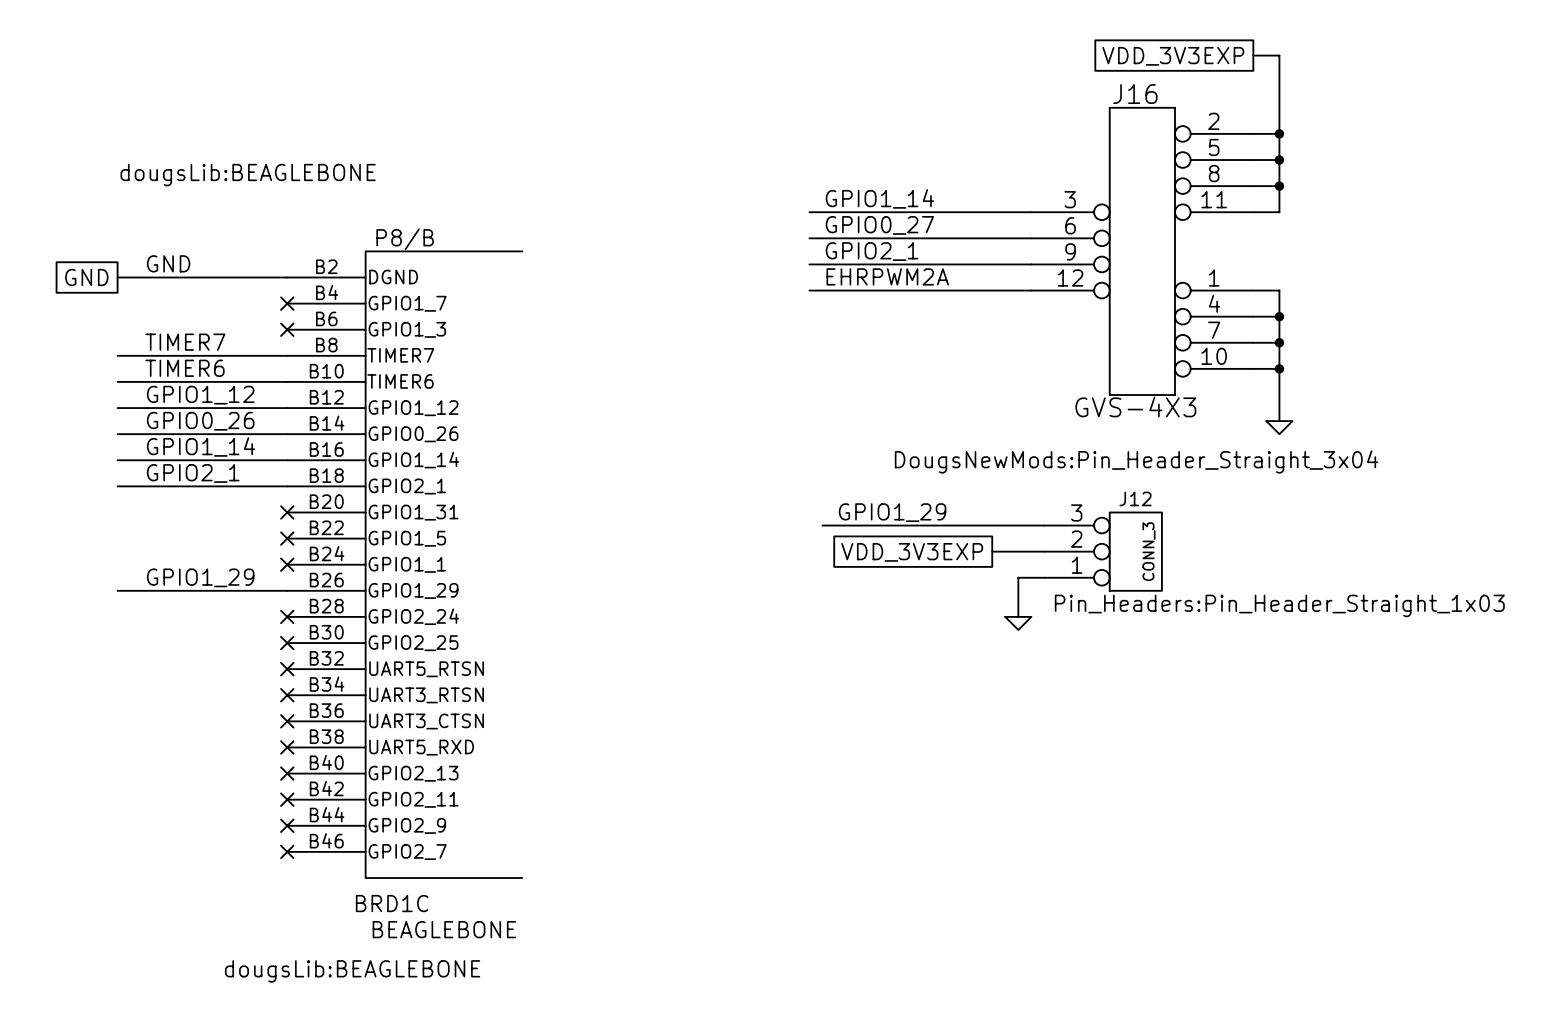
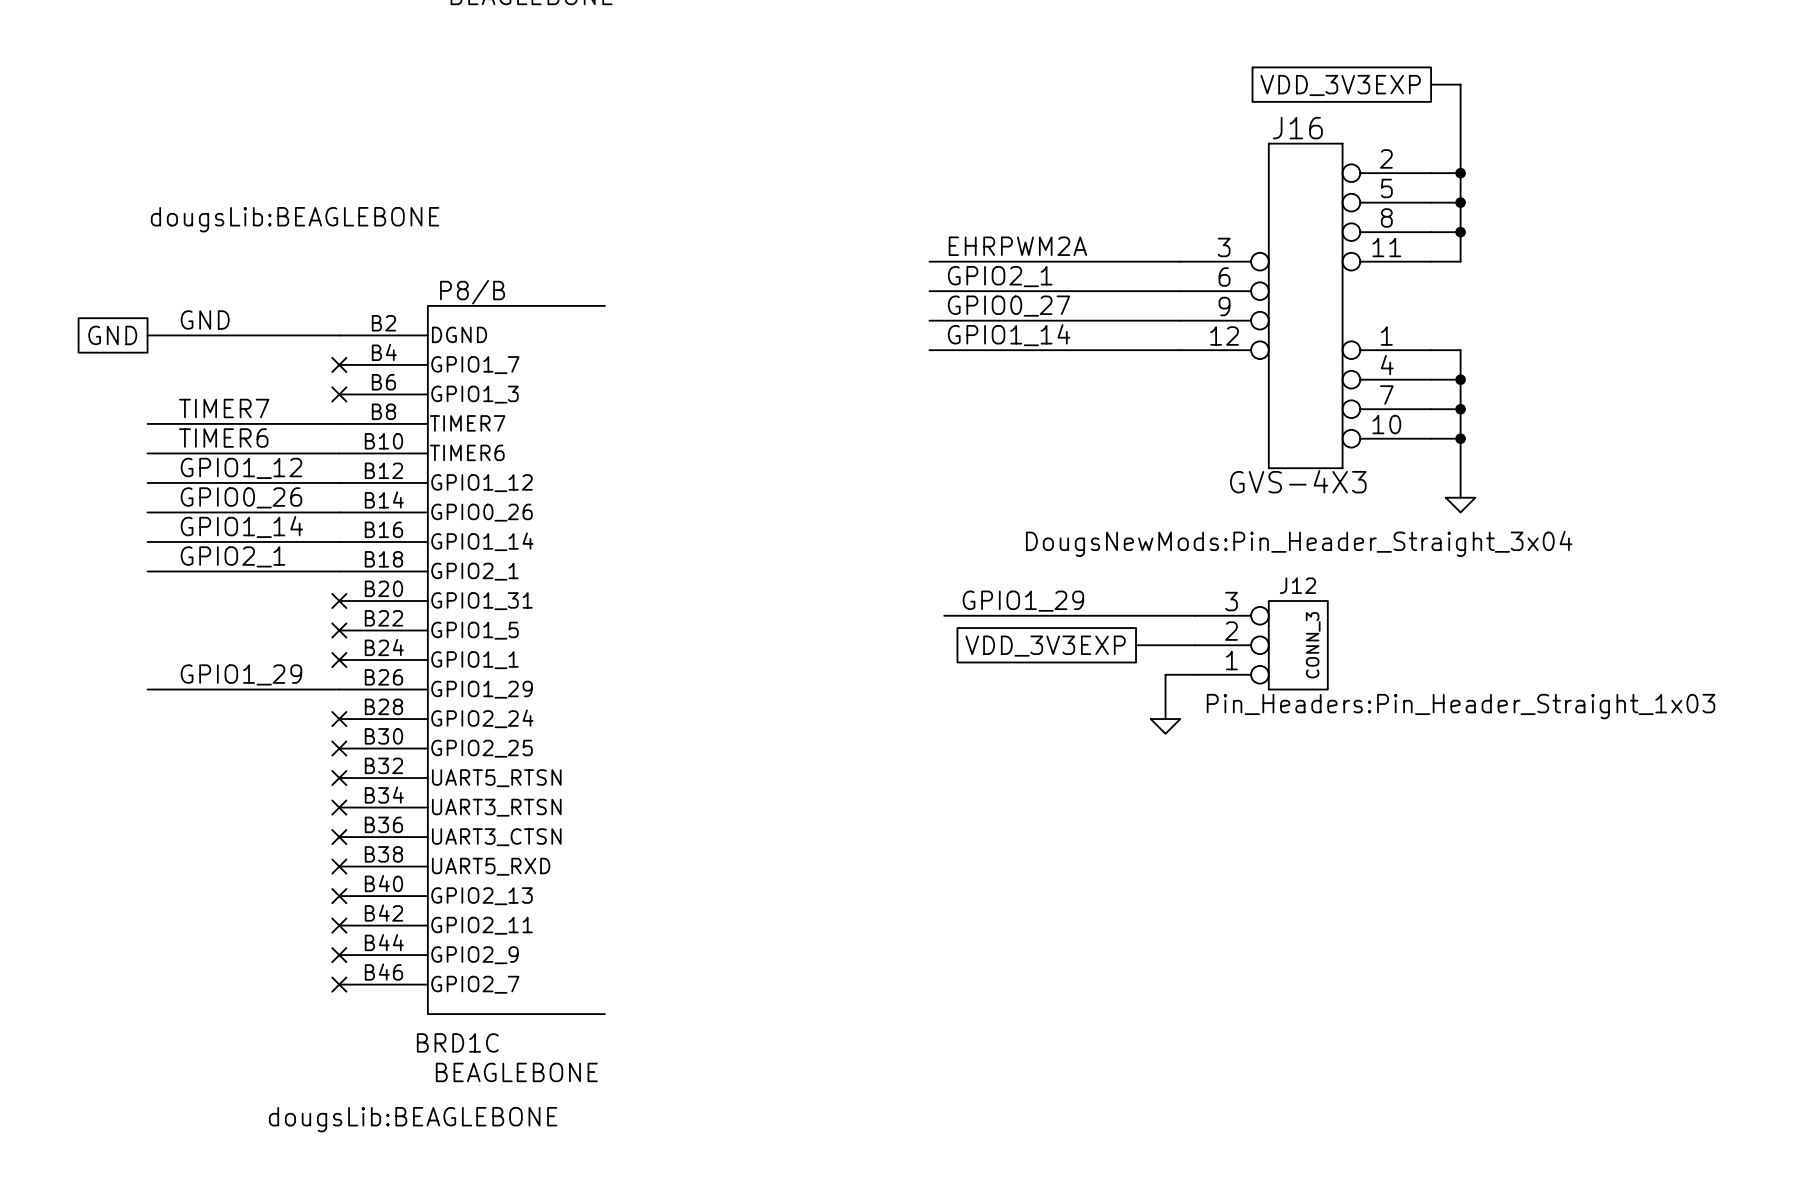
label: GPIO1_14 (879, 198) -> EHRPWM2A (1017, 246)
label: GPIO0_27 (879, 225) -> GPIO2_1 (1000, 276)
label: GPIO2_1 (872, 251) -> GPIO0_27 (1009, 306)
label: EHRPWM2A (887, 276) -> GPIO1_14 (1009, 335)

